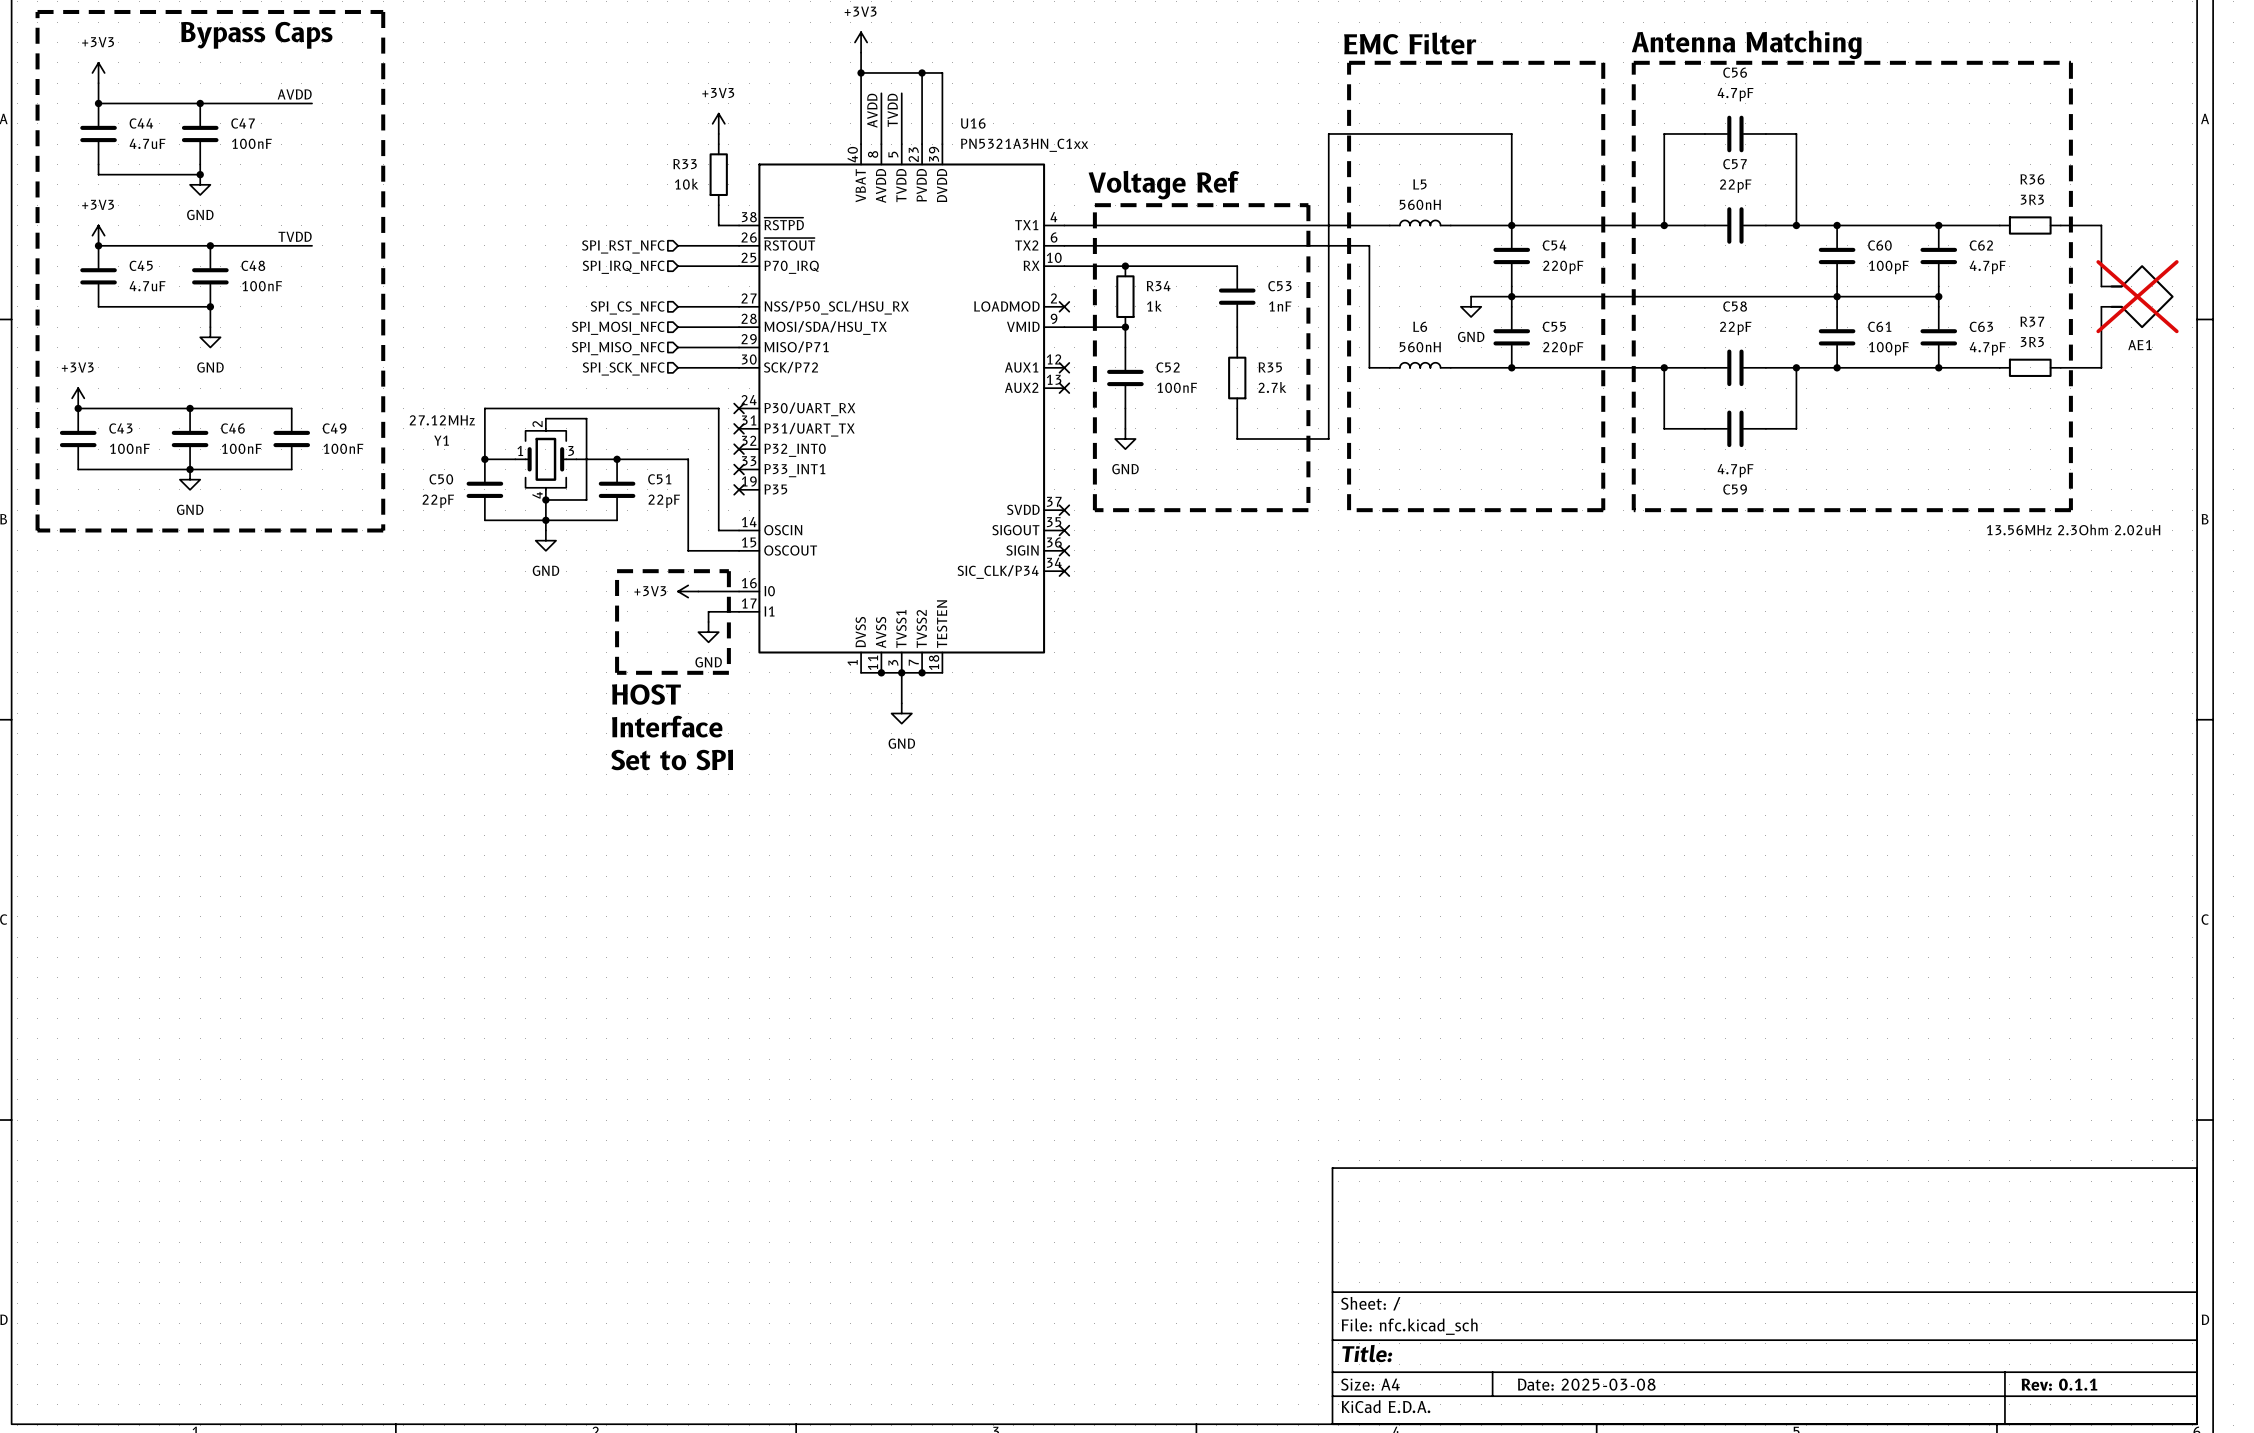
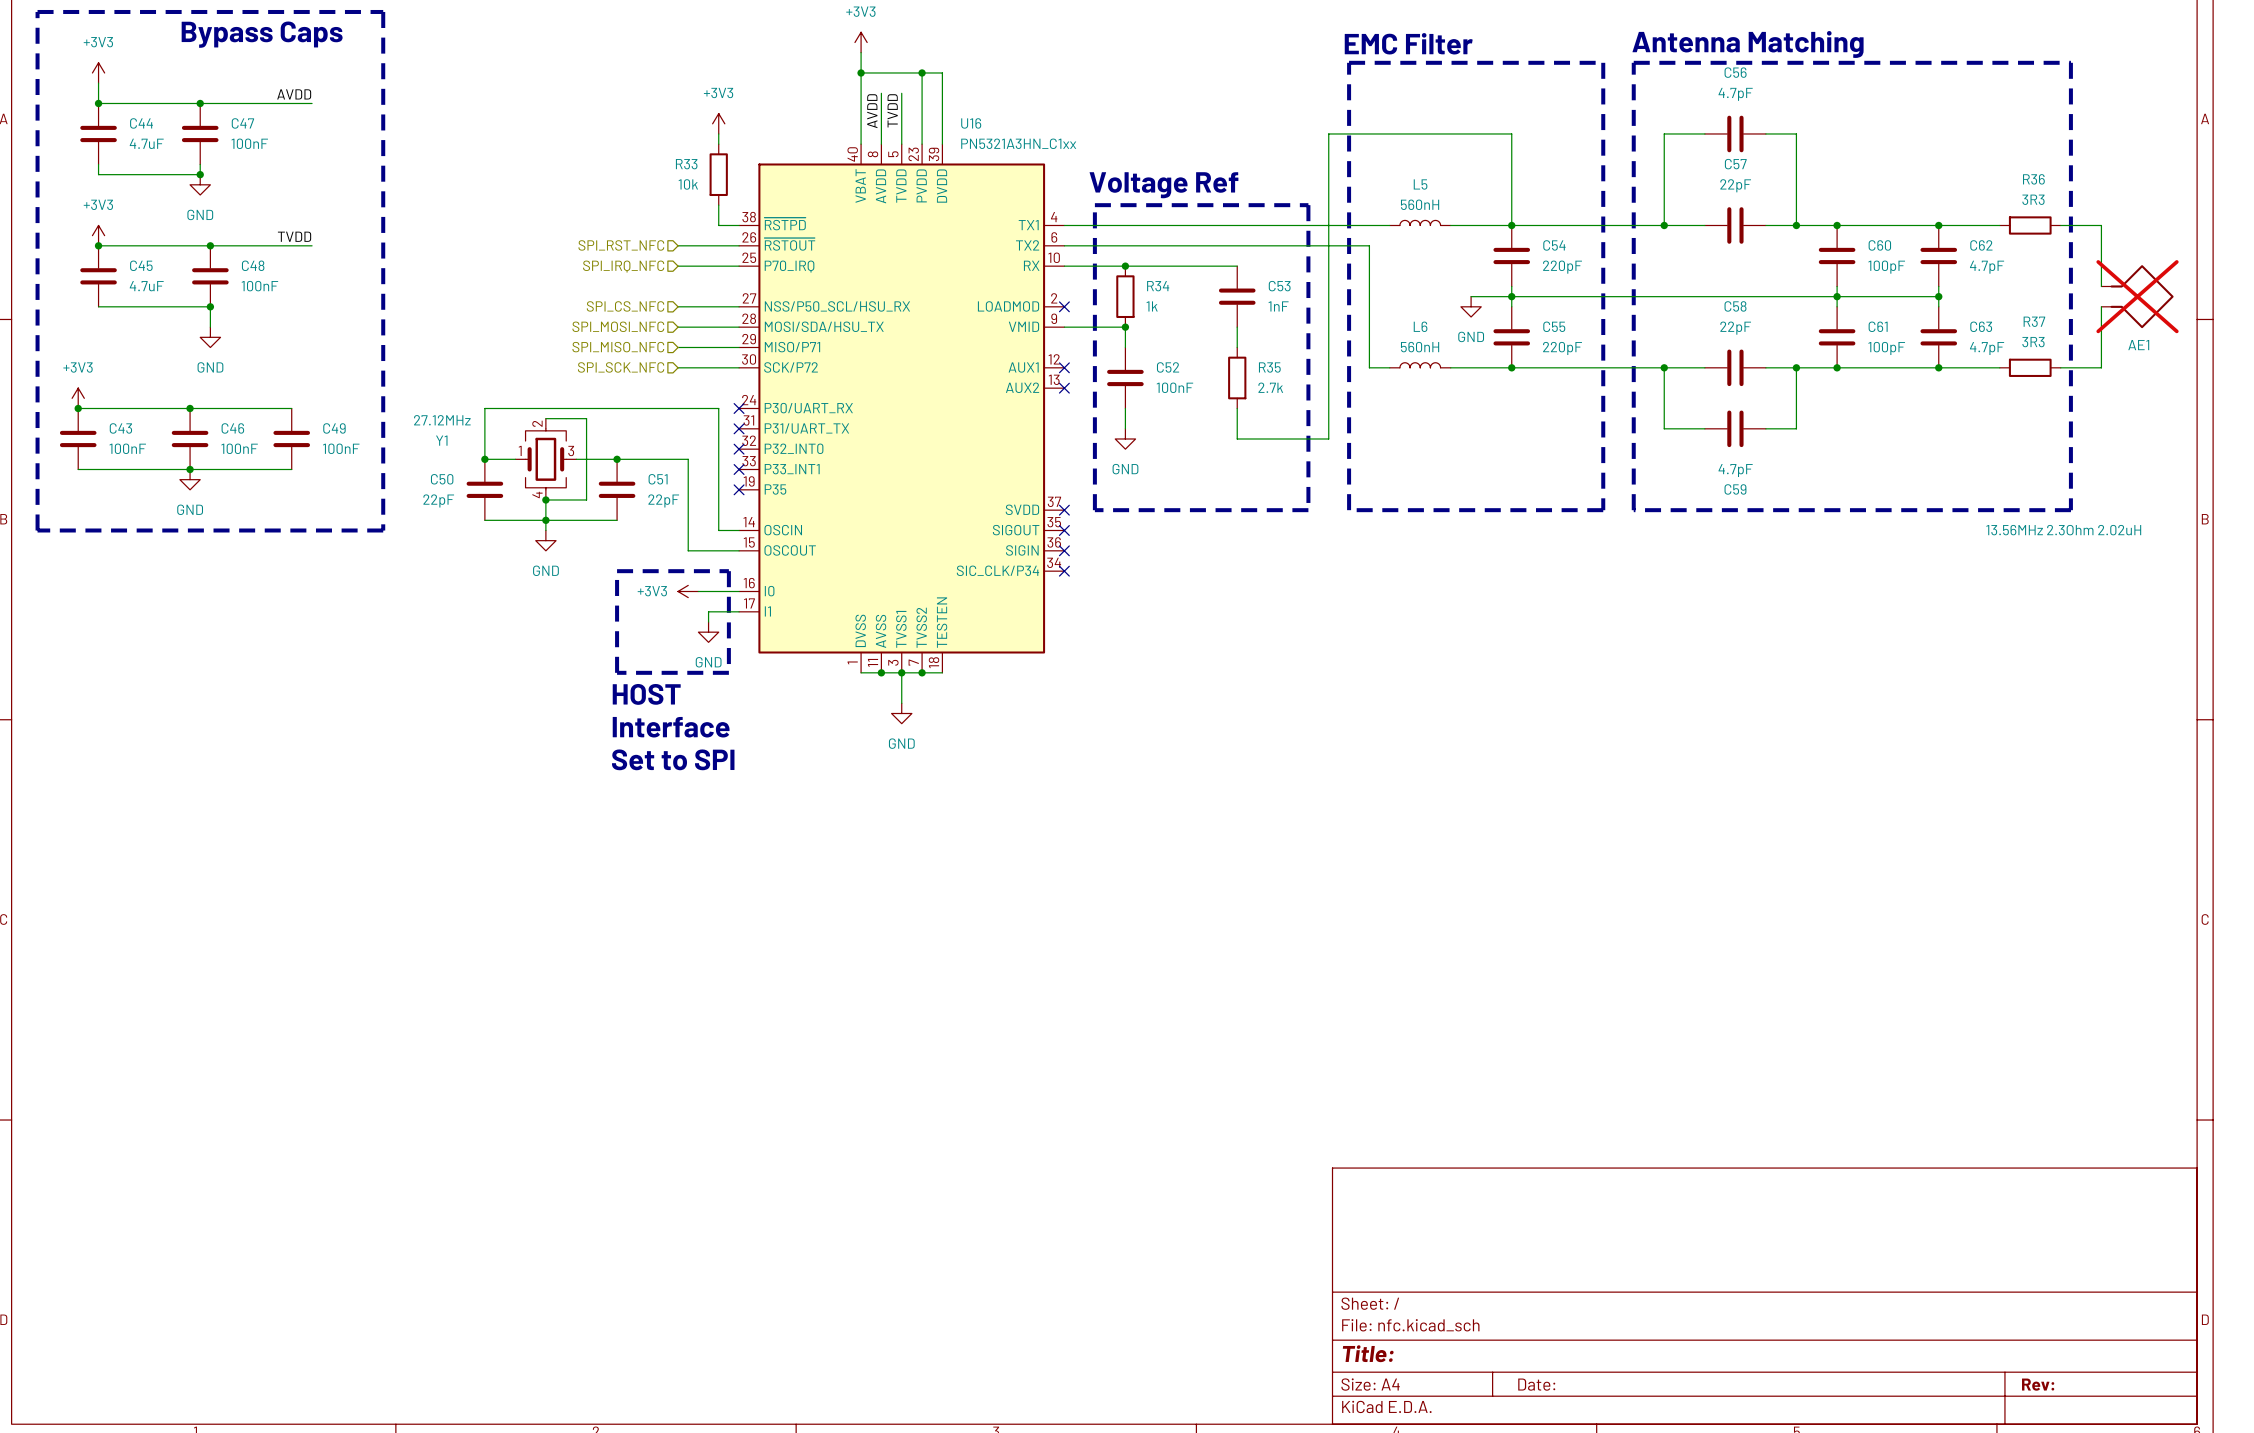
title block: Date: 2025-03-08 (1586, 1384) -> Date: (1536, 1384)
title block: Rev: 0.1.1 (2059, 1384) -> Rev: (2038, 1384)

